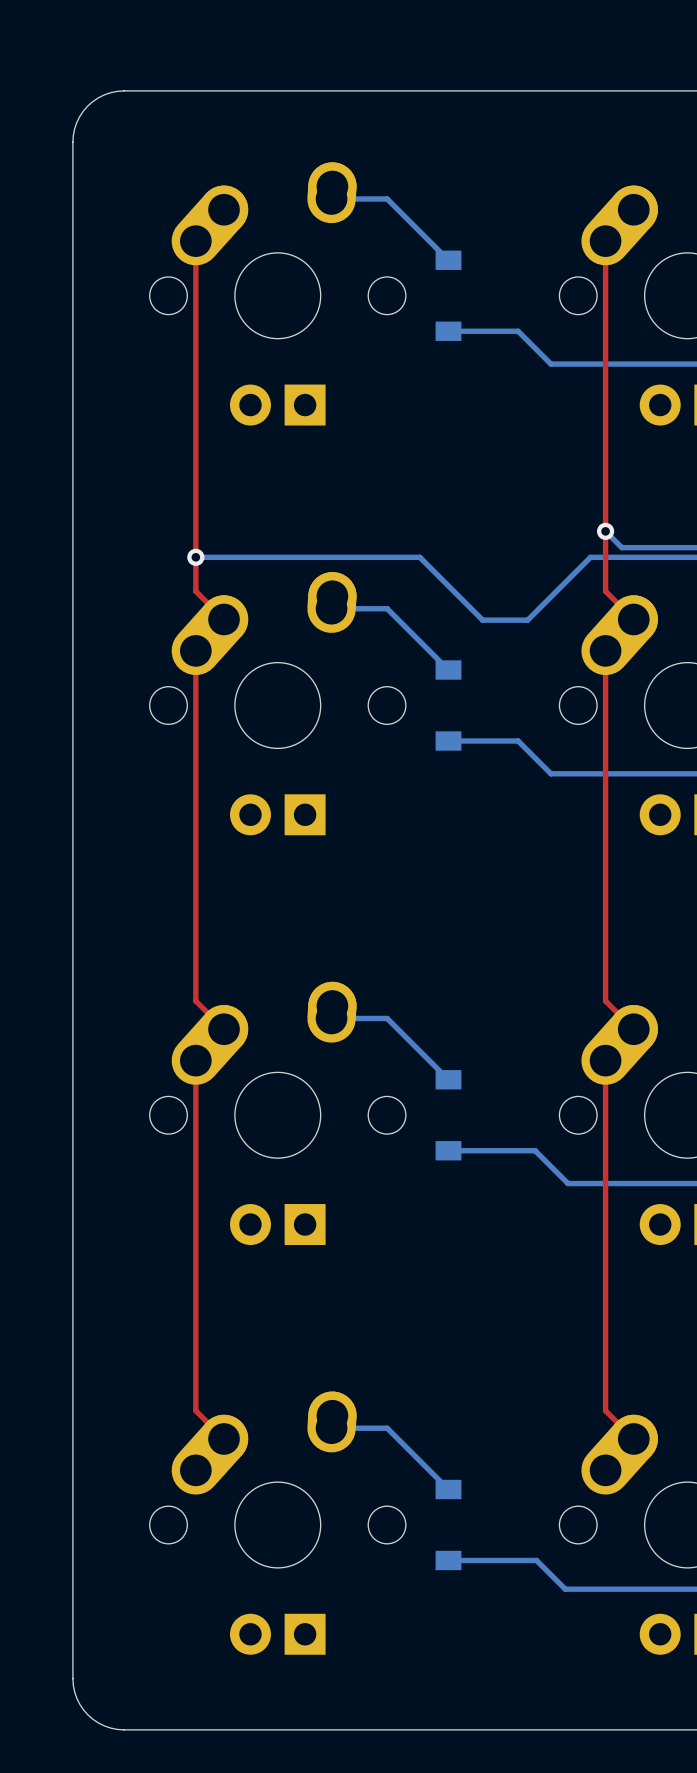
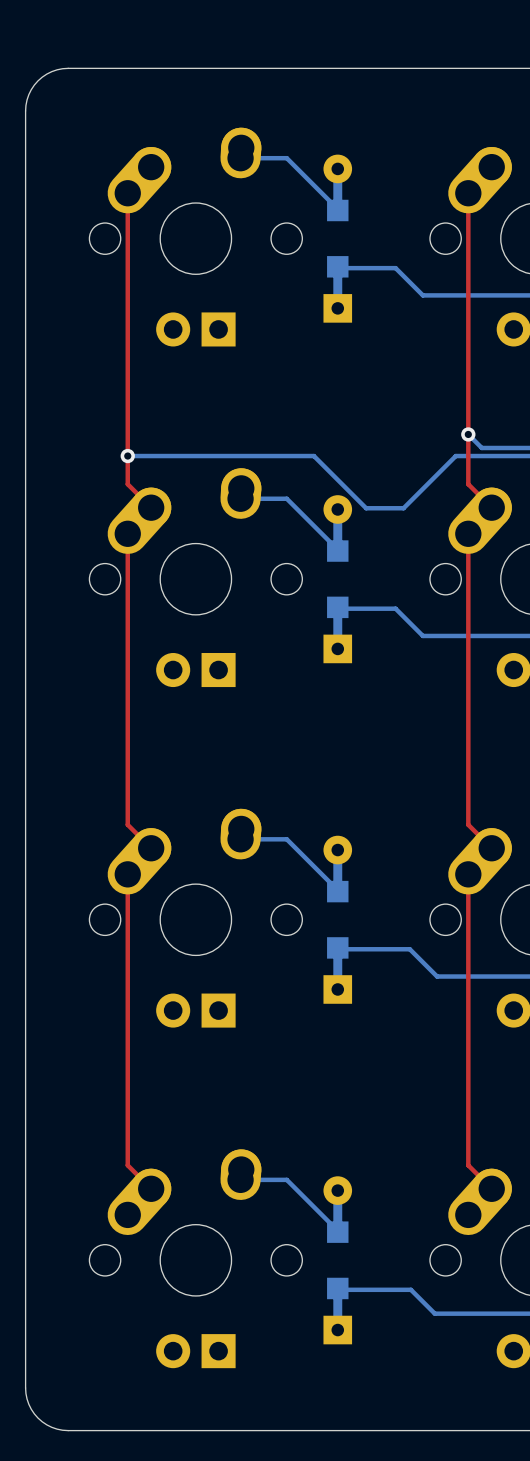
part footprint: [435, 250, 462, 341] -> [323, 154, 353, 323]
part footprint: [435, 660, 462, 751] -> [323, 495, 353, 664]
part footprint: [435, 1070, 462, 1161] -> [323, 835, 353, 1004]
part footprint: [435, 1479, 462, 1571] -> [323, 1176, 353, 1345]

